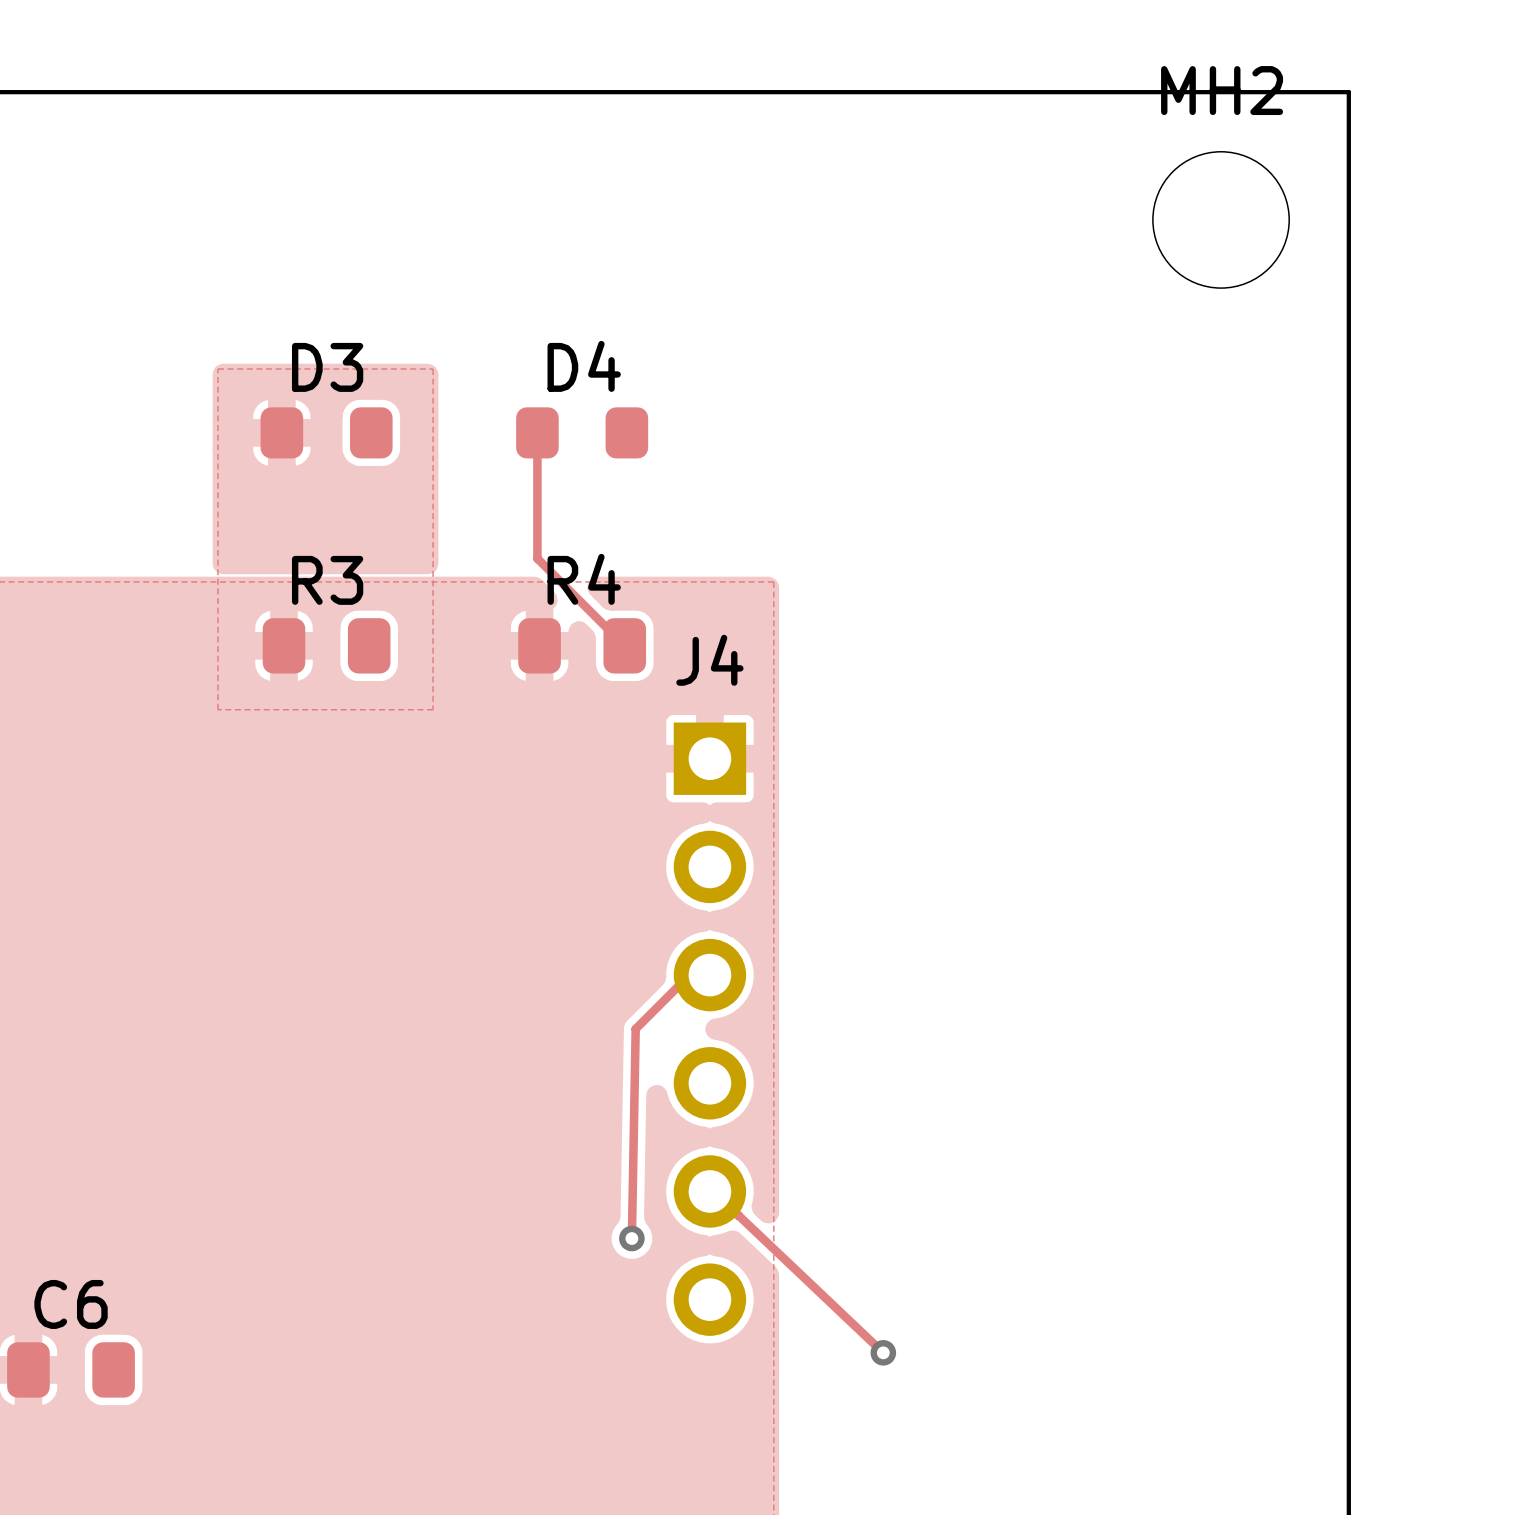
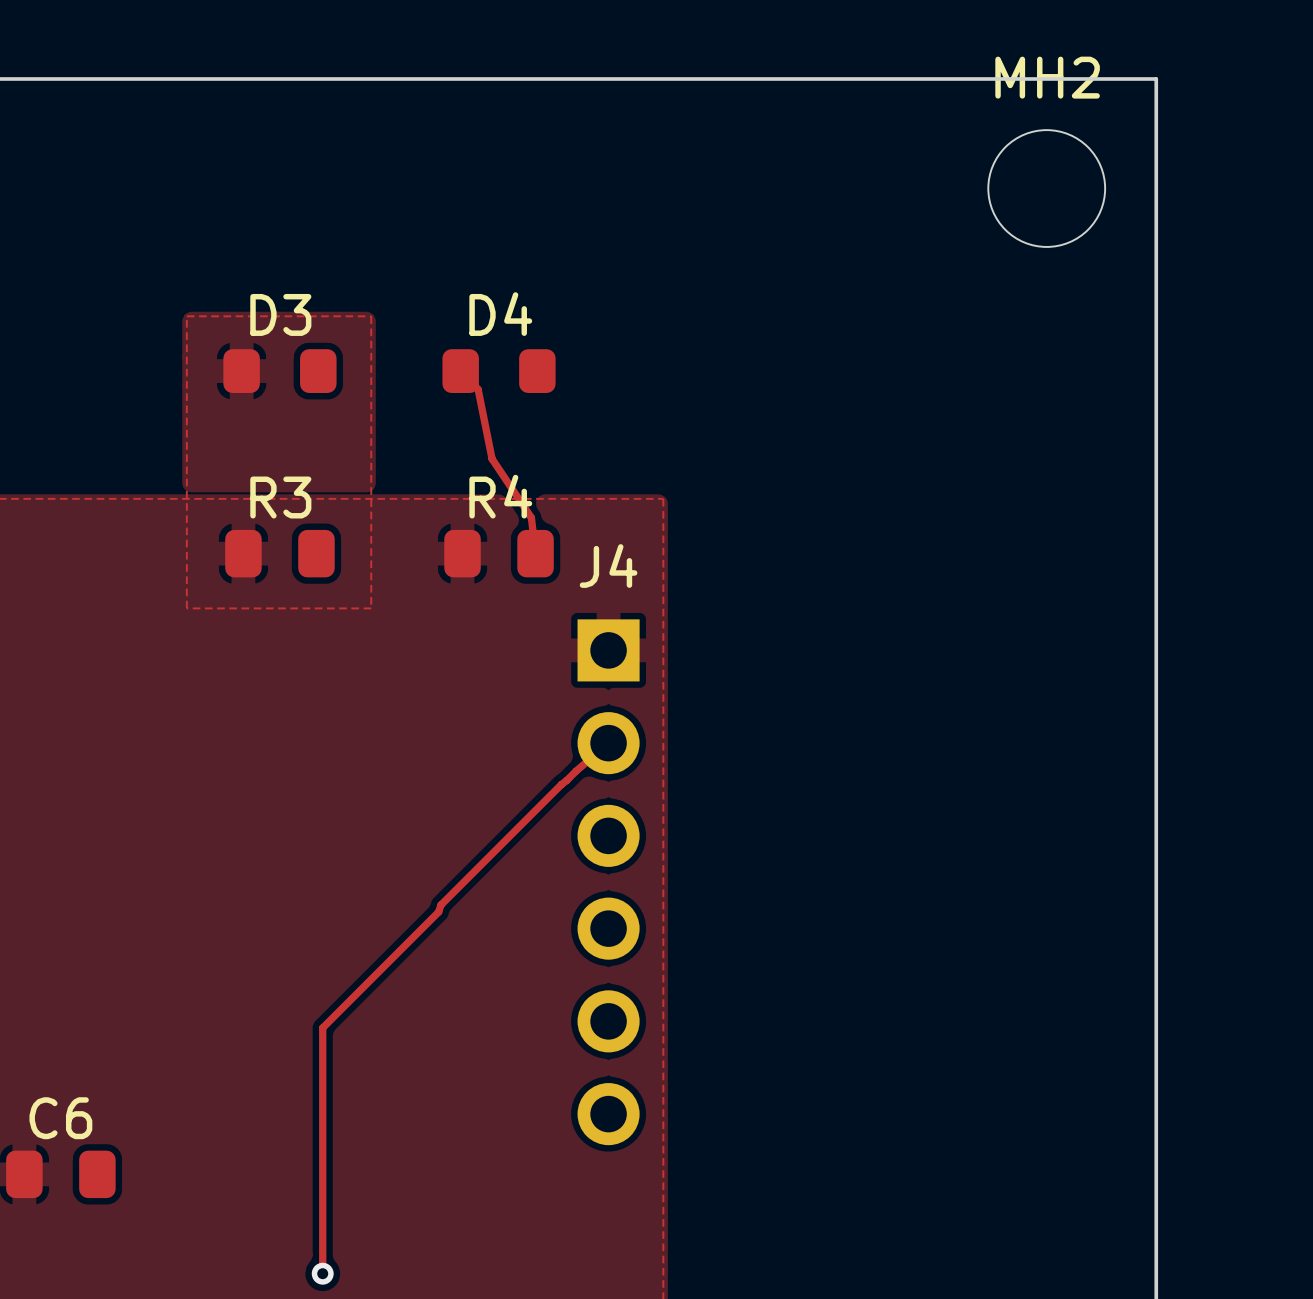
track: (537, 432) (537, 558) (624, 645) -> (460, 371) (478, 389) (492, 458) (531, 517) (535, 553)
track: none -> (608, 743) (561, 784) (440, 905) (438, 912) (322, 1027) (322, 1273)
track: (709, 975) (681, 983) (635, 1029) (631, 1238) -> none
track: (738, 1215) (883, 1352) -> none
via: (631, 1238) -> none
via: (883, 1352) -> none
via: none -> (322, 1273)

